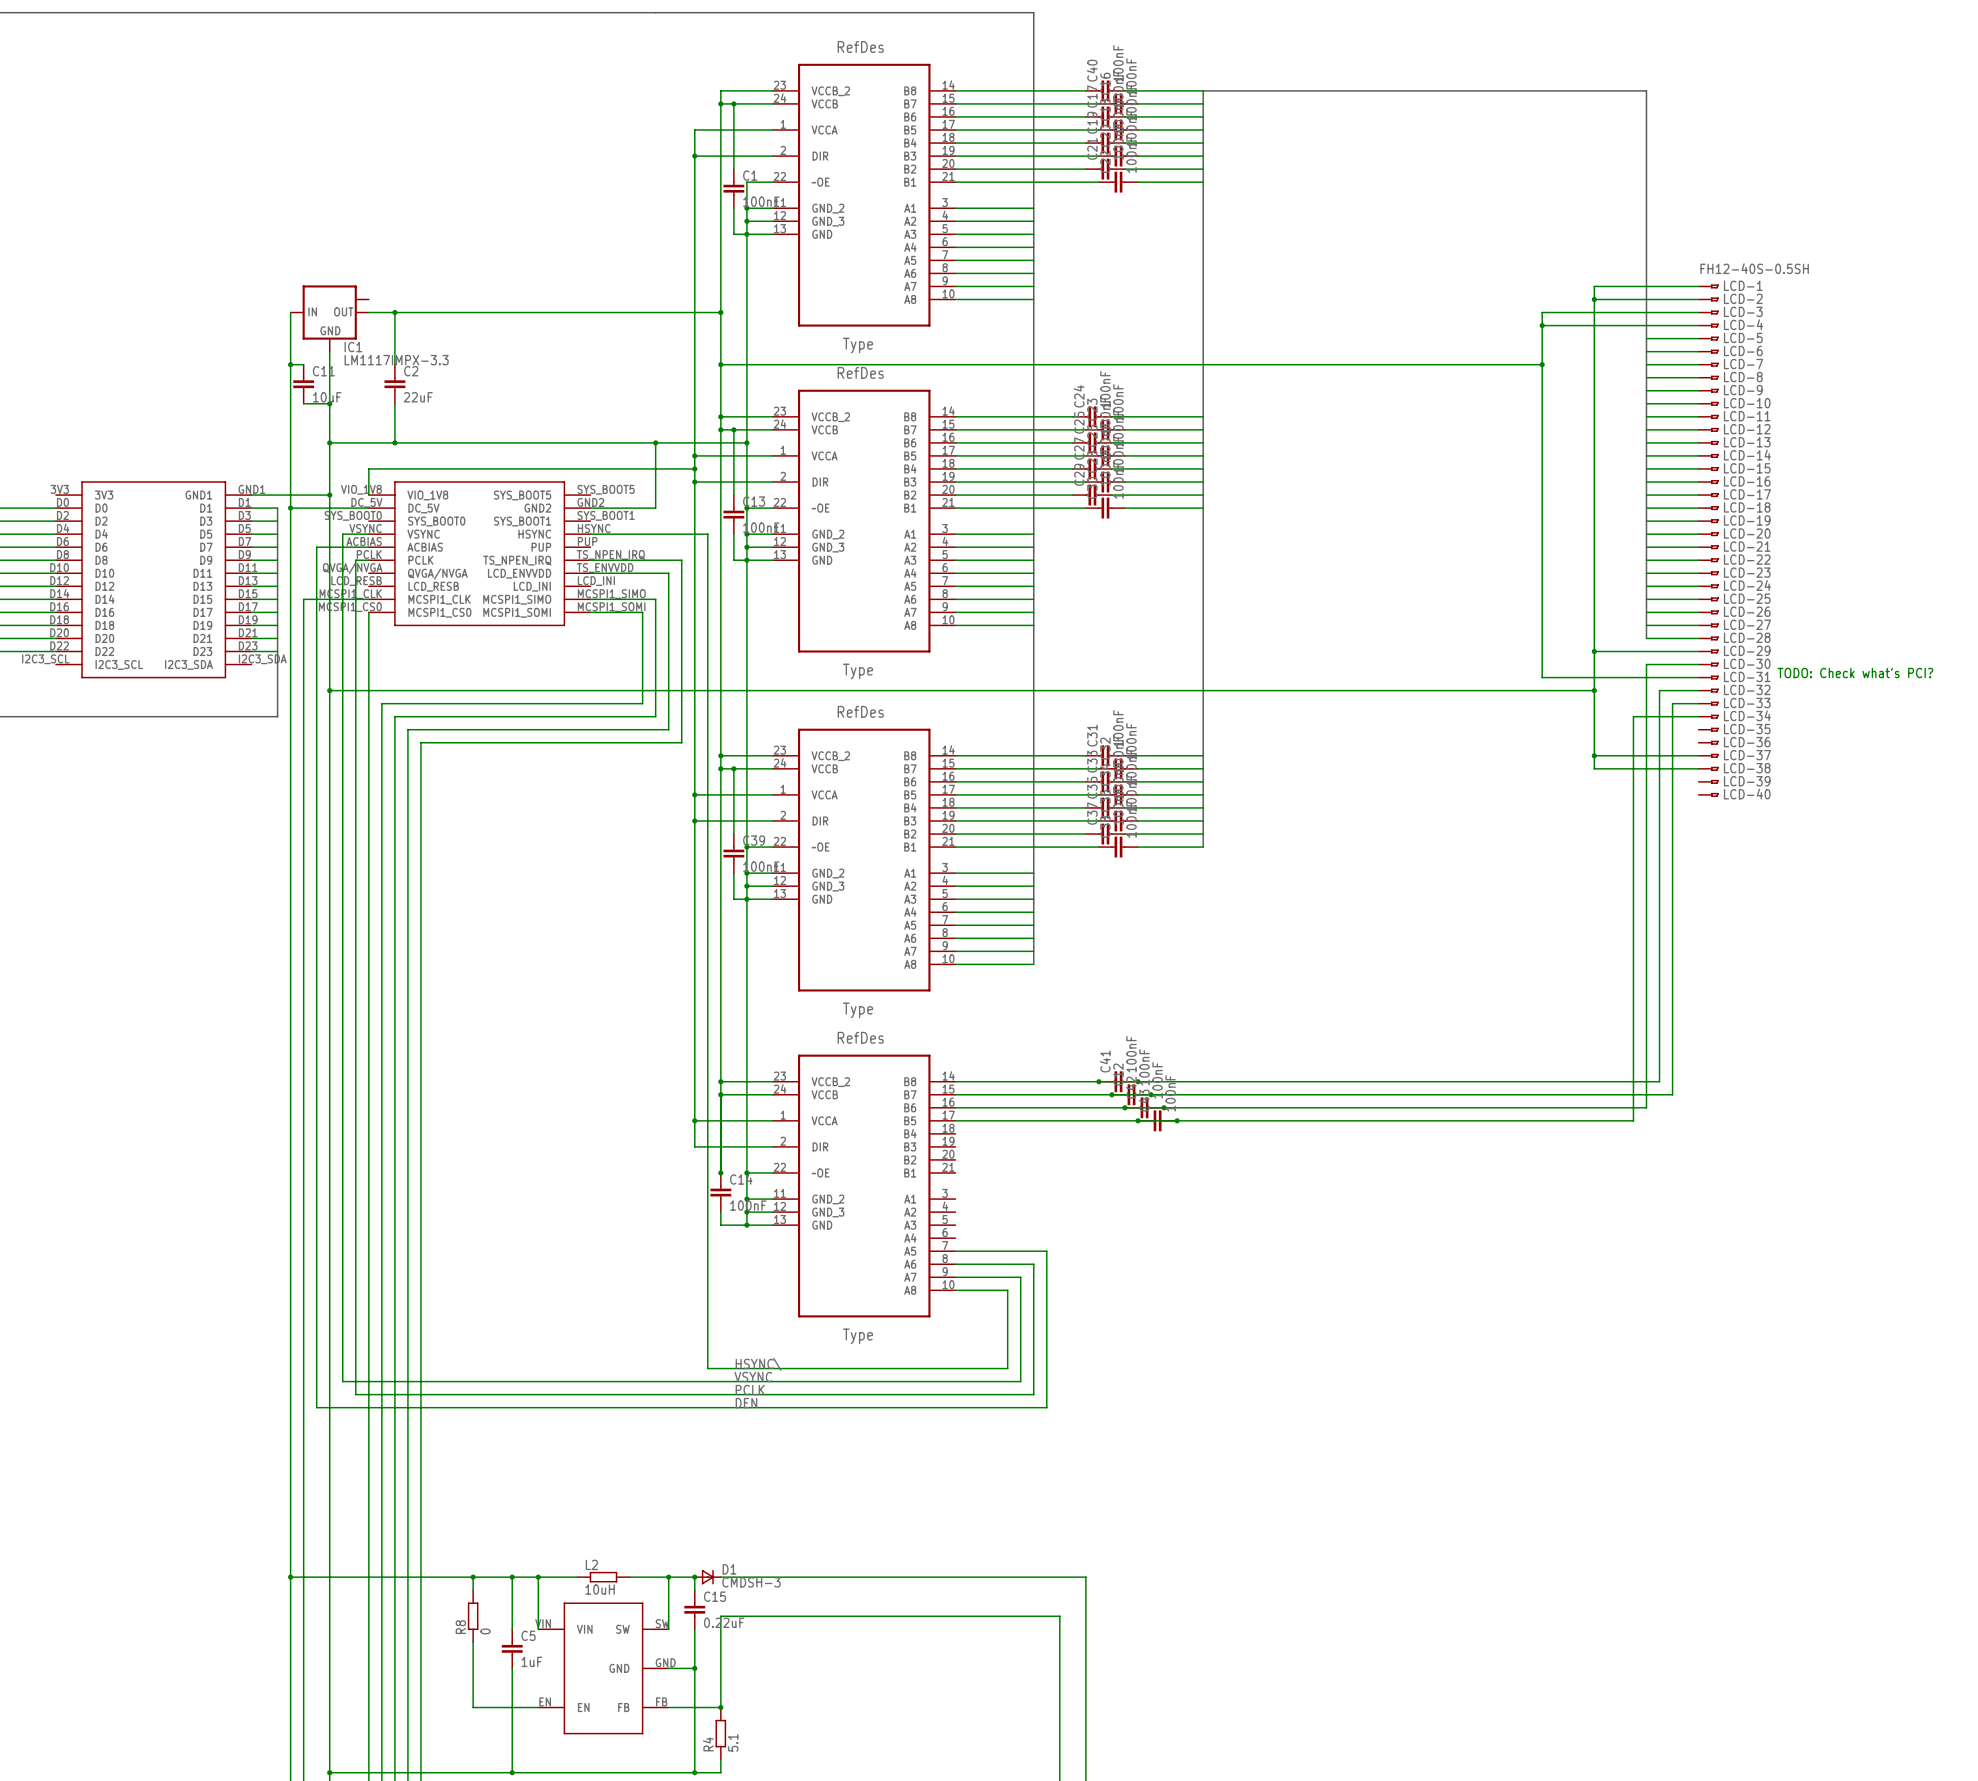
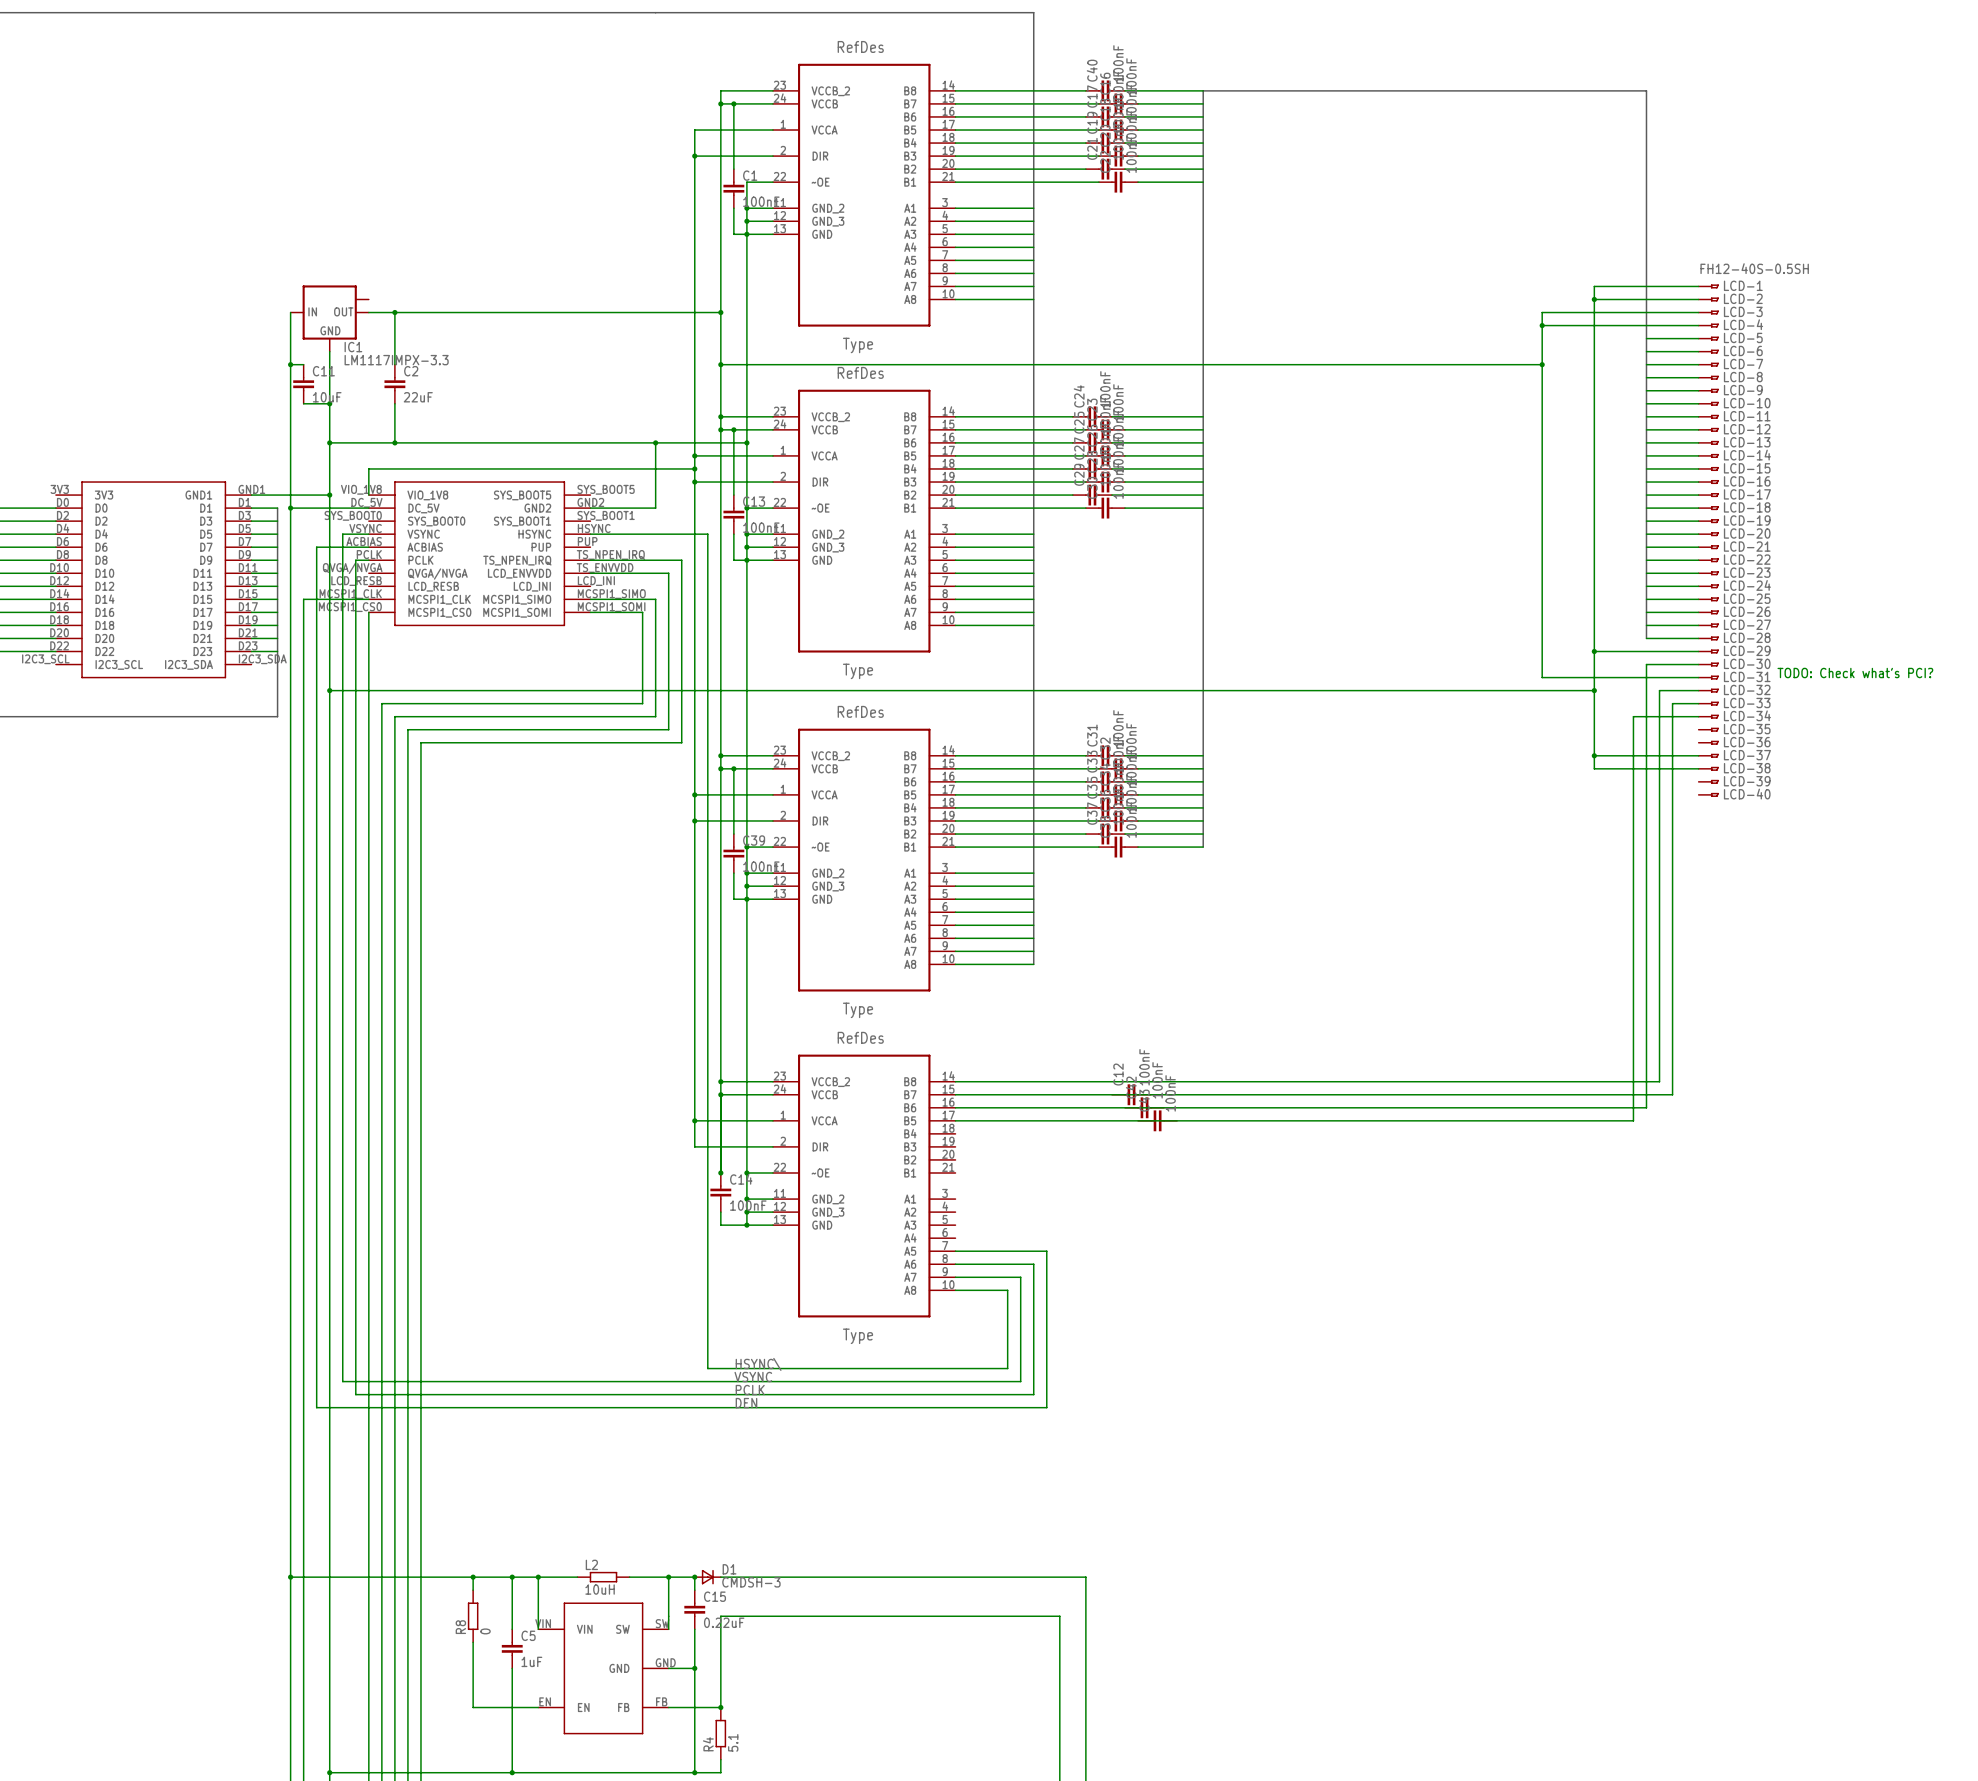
junction: (1098, 1081) -> none
C41: 100nF (1118, 1081) -> none
junction: (1138, 1081) -> none
junction: (1111, 1094) -> none
junction: (1151, 1094) -> none
junction: (1124, 1107) -> none
junction: (1164, 1107) -> none
junction: (1138, 1120) -> none
junction: (1177, 1120) -> none

